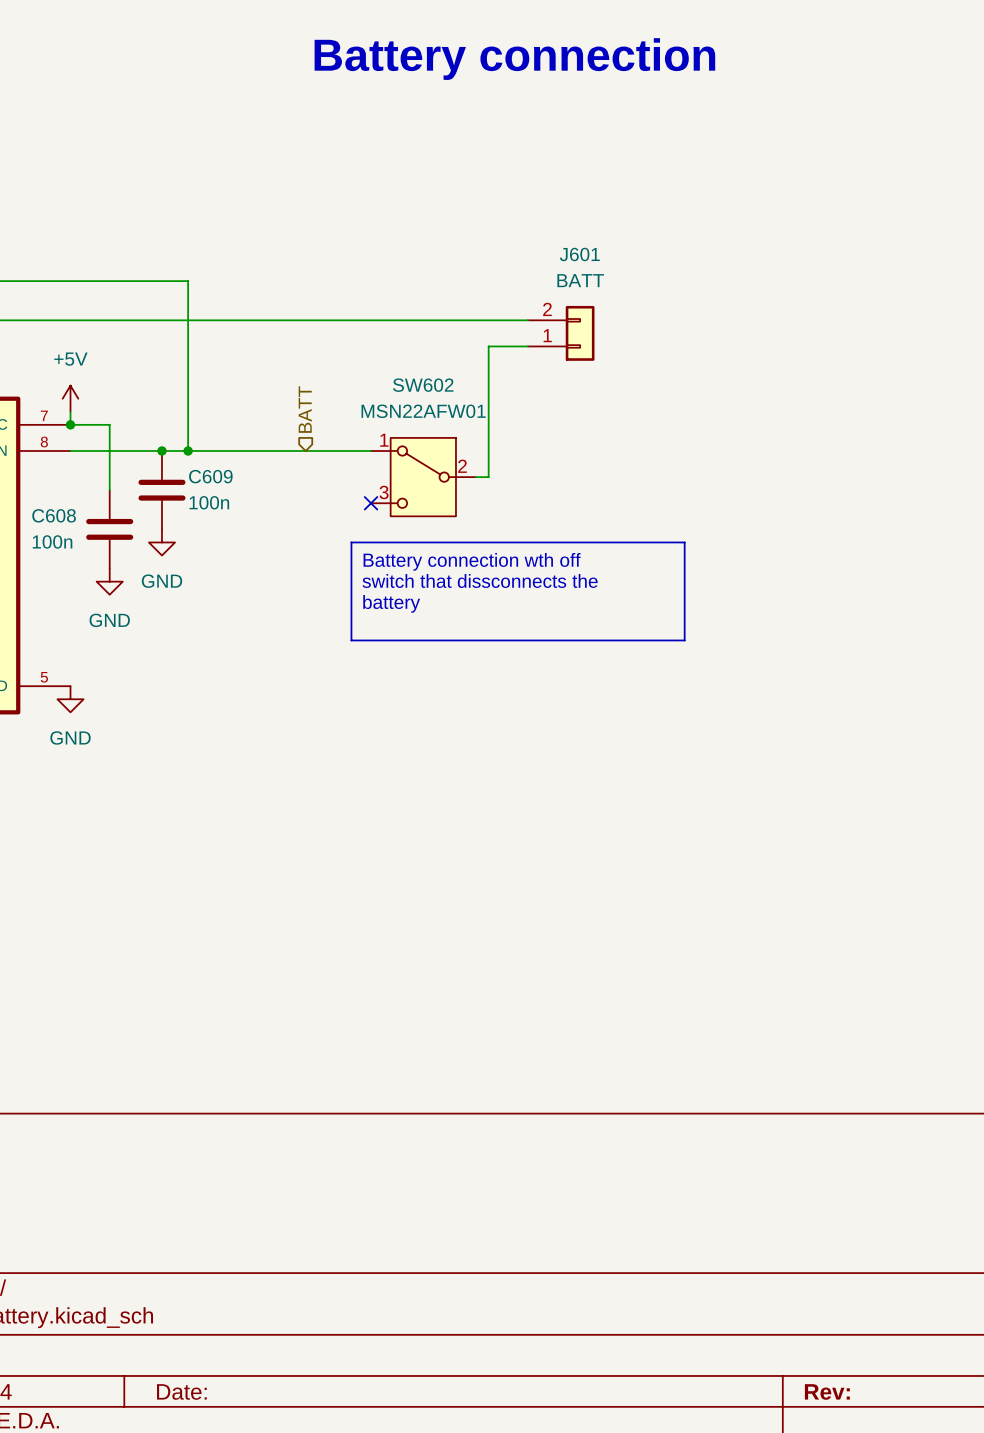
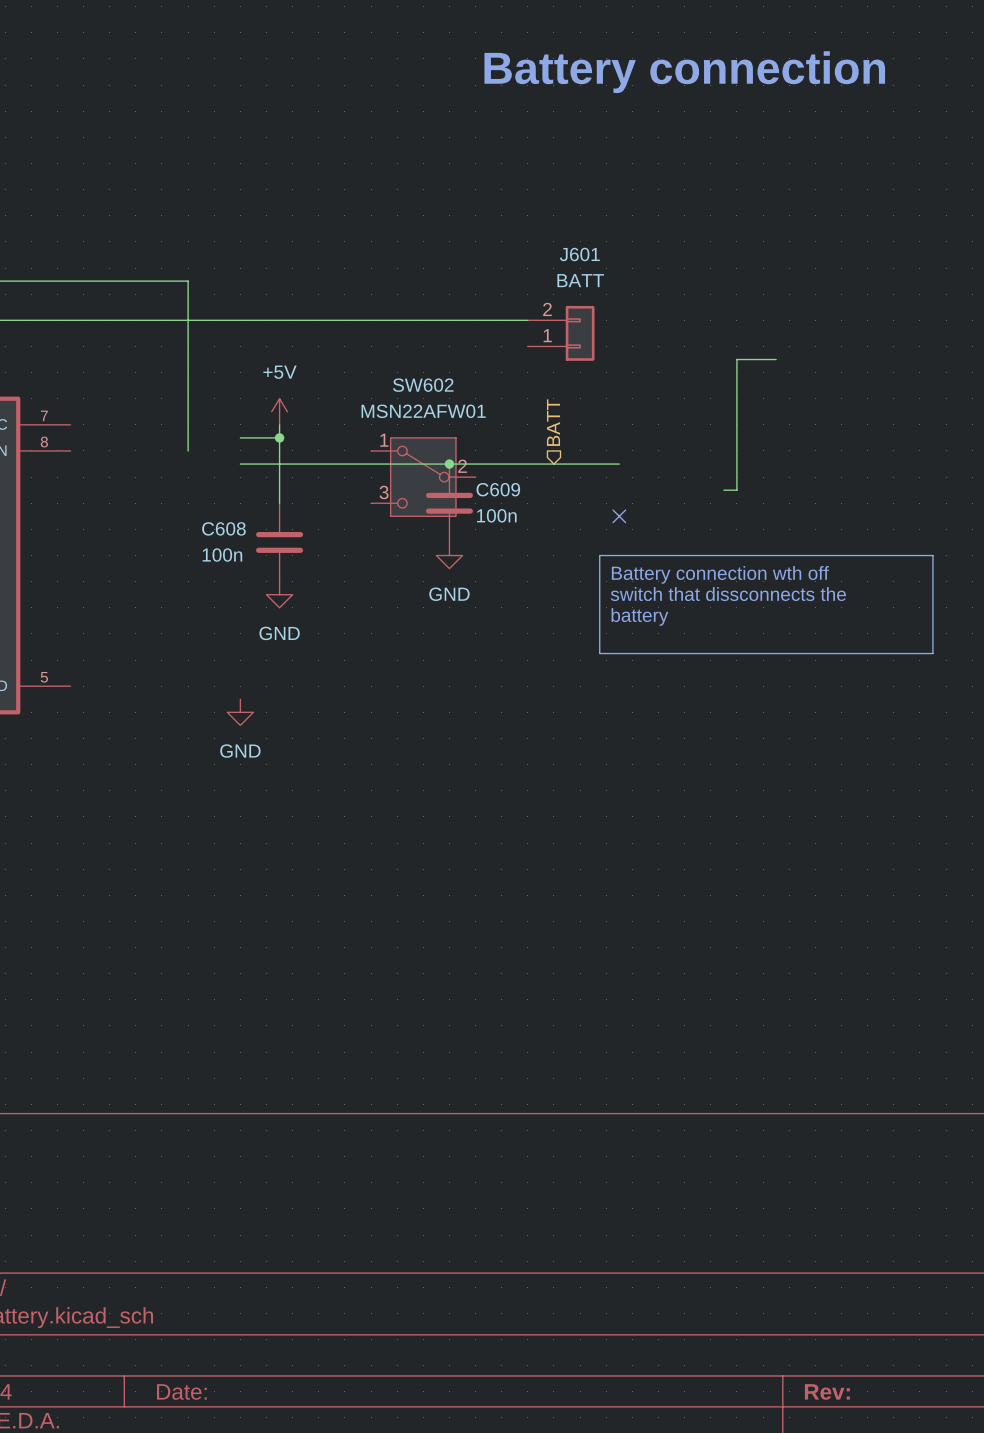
text position: Battery connection (514, 59) -> Battery connection (684, 72)
wire: (527, 346) (488, 346) (488, 477) (475, 477) -> (776, 359) (736, 359) (736, 490) (723, 490)
power symbol position: +5V (70, 398) -> +5V (279, 411)
hierarchical label position: BATT (305, 409) -> BATT (553, 422)
wire: (70, 411) (70, 424) (109, 424) (109, 490) -> none
junction: (70, 424) -> none
wire: none -> (279, 424) (279, 503)
wire: none -> (240, 437) (279, 437)
junction: none -> (279, 437)
wire: (70, 450) (371, 450) -> none
junction: (161, 450) -> none
junction: (188, 450) -> none
wire: none -> (240, 464) (619, 464)
junction: none -> (449, 464)
C609 position: (161, 490) -> (449, 503)
no-connect mark: (371, 503) -> none
no-connect mark: none -> (619, 516)
C608 position: (109, 529) -> (279, 542)
power symbol: GND (161, 542) -> none
line: (351, 542) (684, 542) (684, 640) (351, 640) (351, 542) -> (599, 555) (932, 555) (932, 653) (599, 653) (599, 555)
power symbol: none -> GND (449, 555)
text position: Battery connection wth off (472, 561) -> Battery connection wth off (720, 574)
text position: switch that dissconnects the (480, 580) -> switch that dissconnects the (728, 594)
power symbol: GND (109, 581) -> none
power symbol: none -> GND (279, 594)
text position: battery (391, 603) -> battery (639, 616)
power symbol: GND (70, 699) -> none
power symbol: none -> GND (240, 712)

